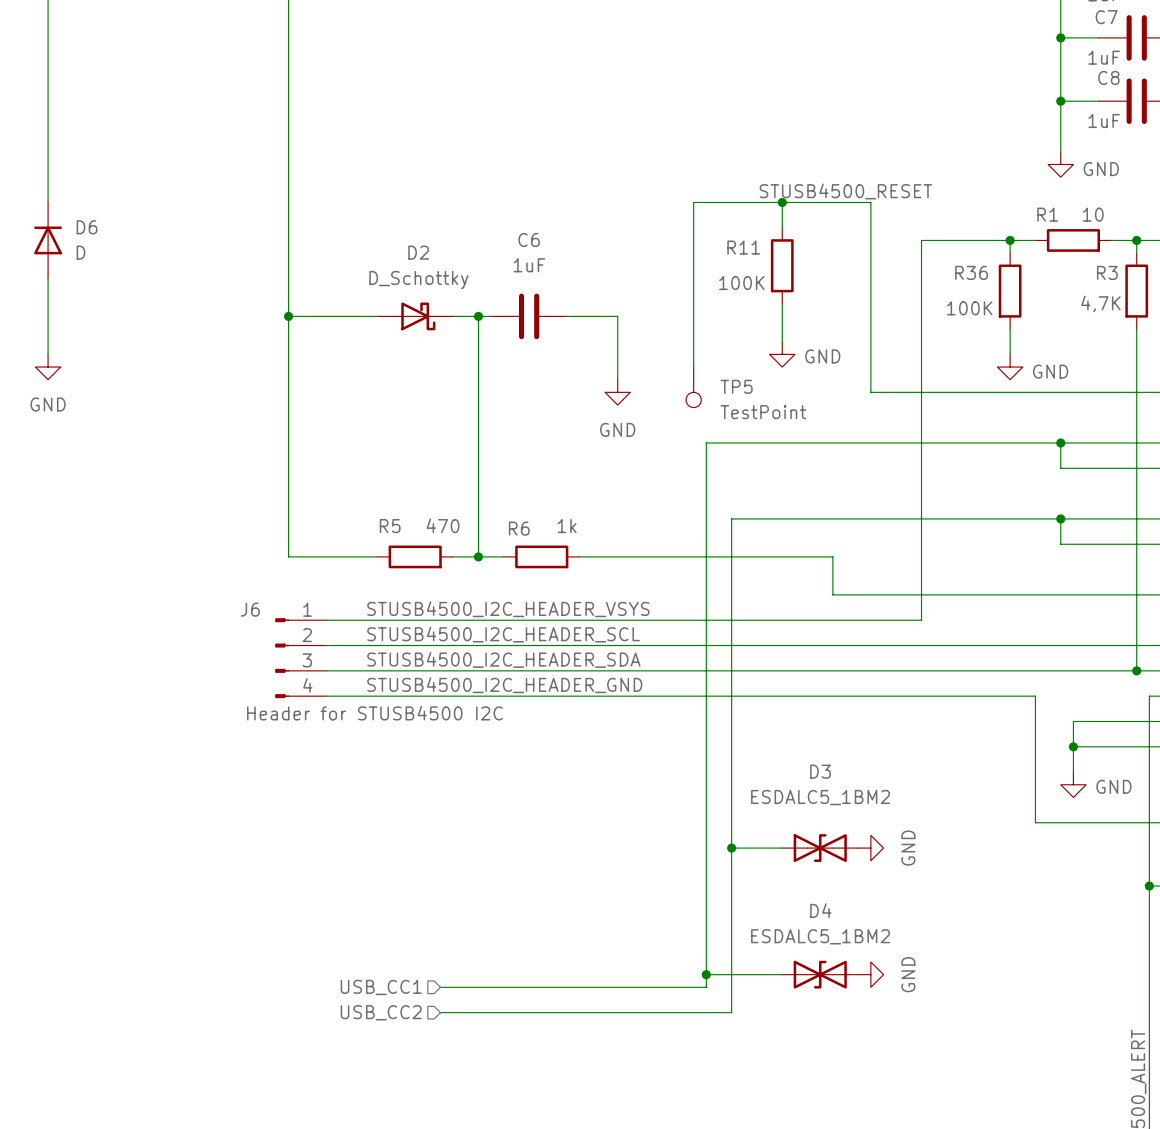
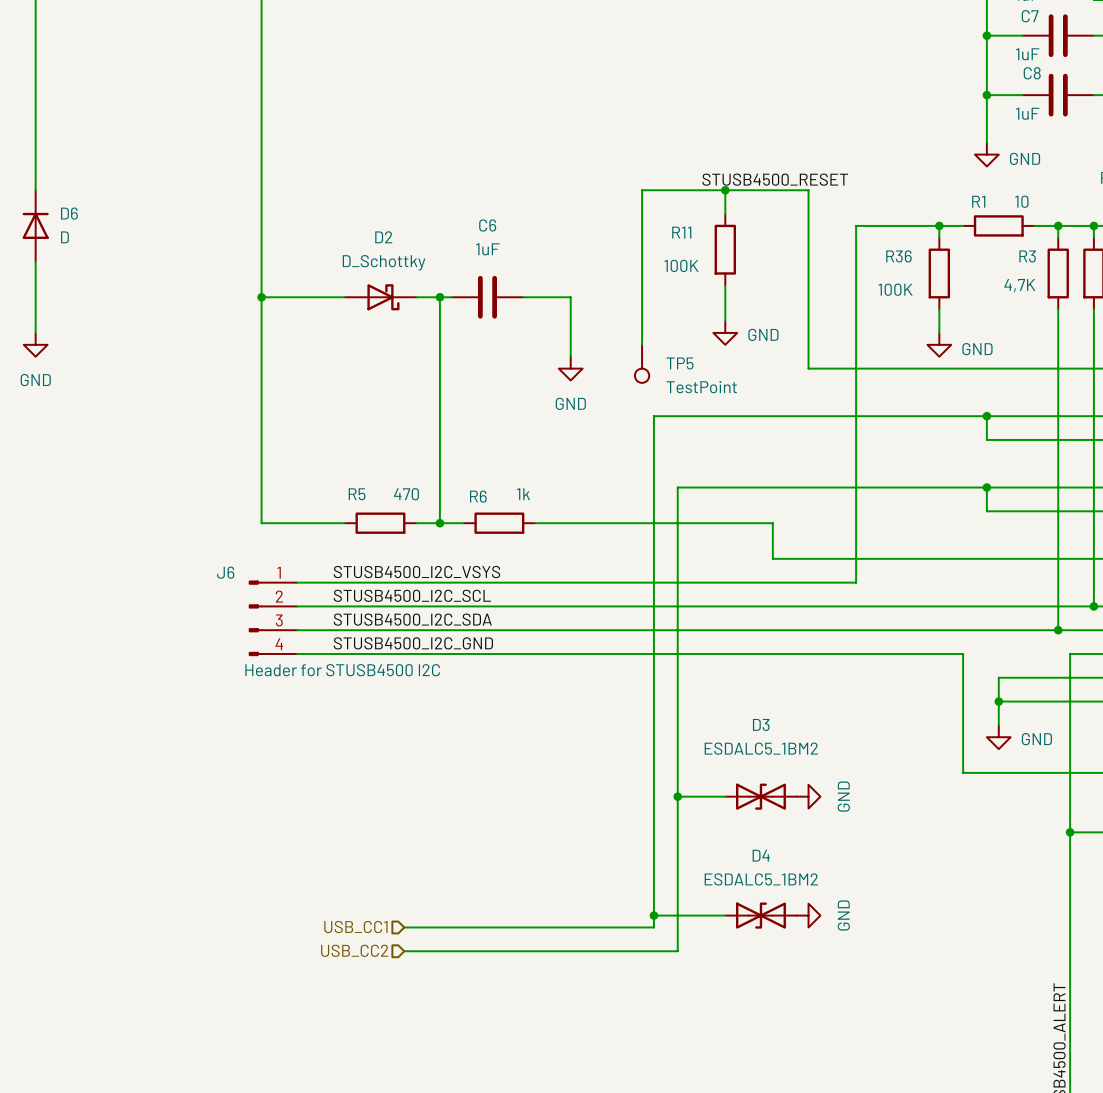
label: STUSB4500_I2C_HEADER_VSYS (508, 609) -> STUSB4500_I2C_VSYS (416, 572)
label: STUSB4500_I2C_HEADER_SCL (503, 634) -> STUSB4500_I2C_SCL (412, 595)
label: STUSB4500_I2C_HEADER_SDA (503, 659) -> STUSB4500_I2C_SDA (412, 619)
label: STUSB4500_I2C_HEADER_GND (504, 685) -> STUSB4500_I2C_GND (413, 643)

